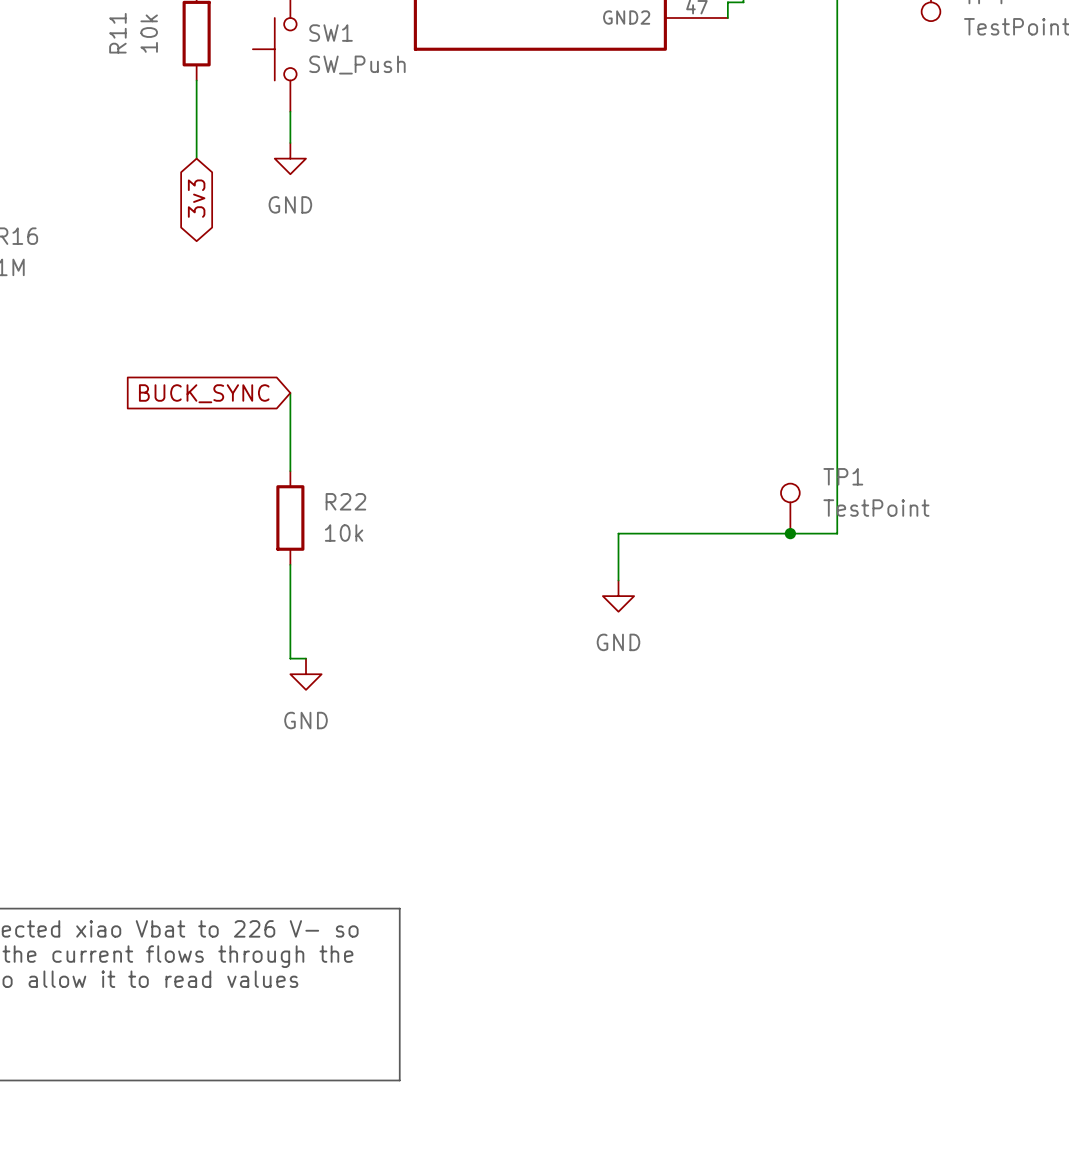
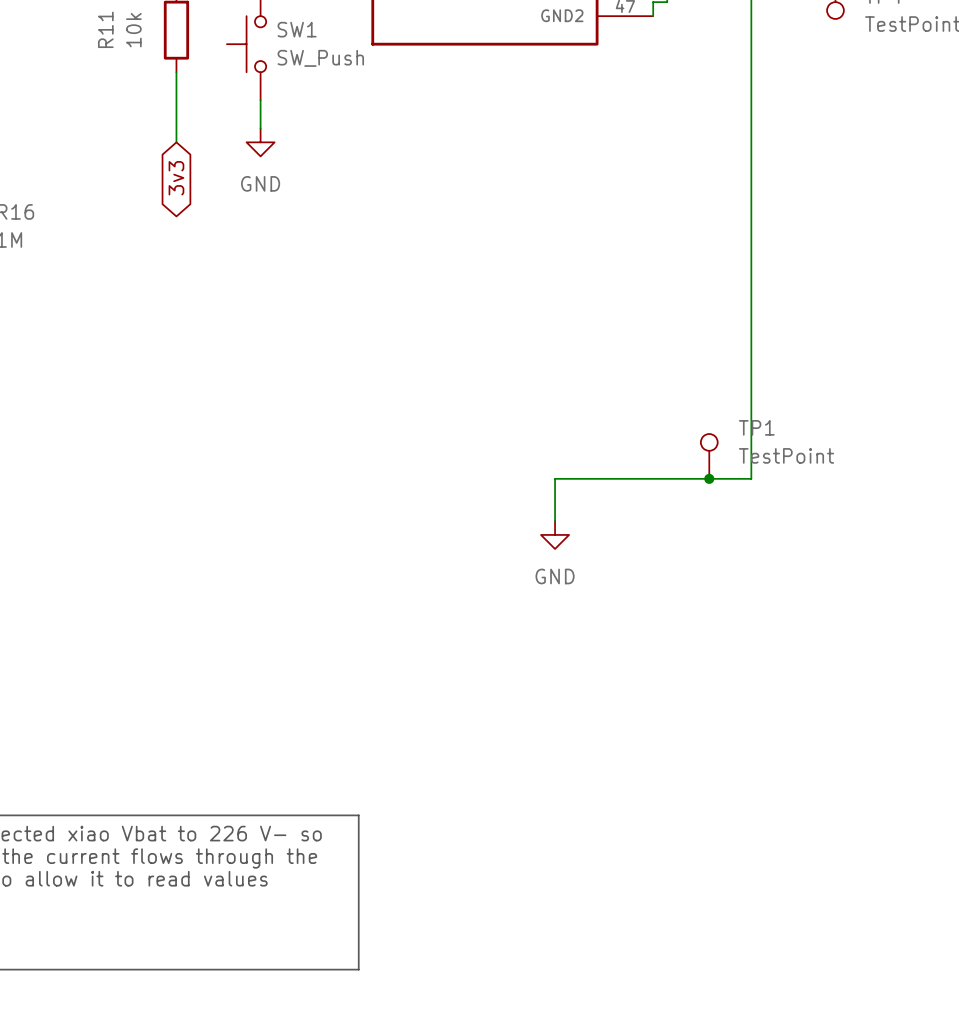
wire: (290, 392) (290, 471) -> none
global label: BUCK_SYNC (204, 393) -> none
R22: 10k (290, 517) -> none
wire: (290, 564) (290, 658) (306, 658) -> none
power symbol: GND (306, 674) -> none

